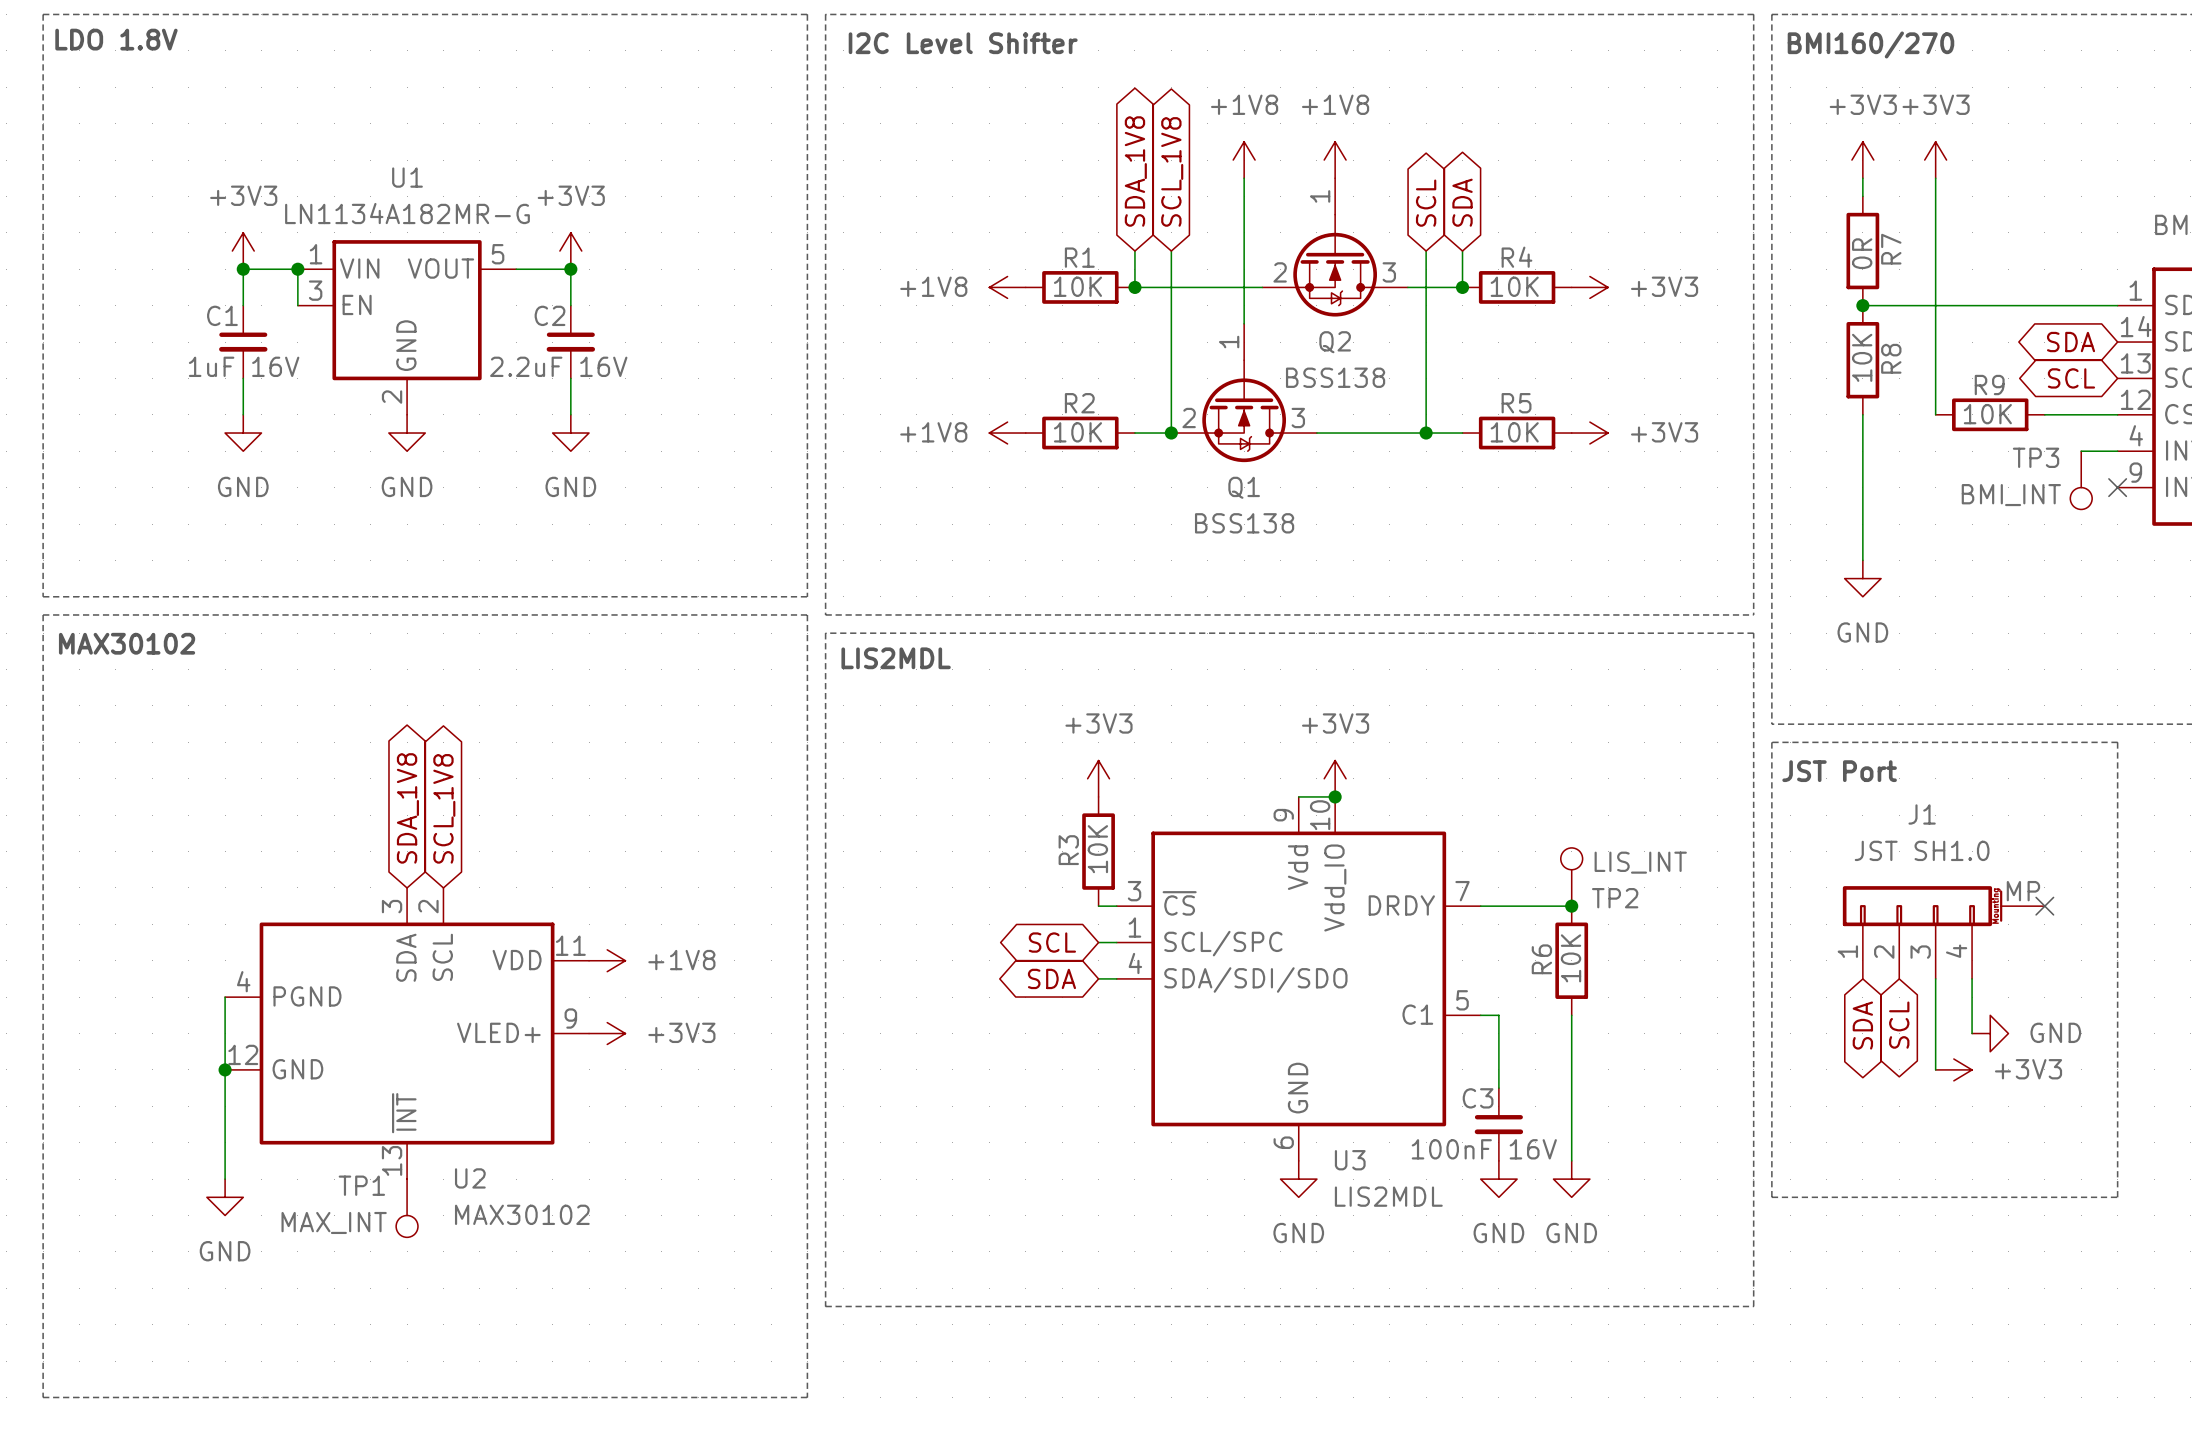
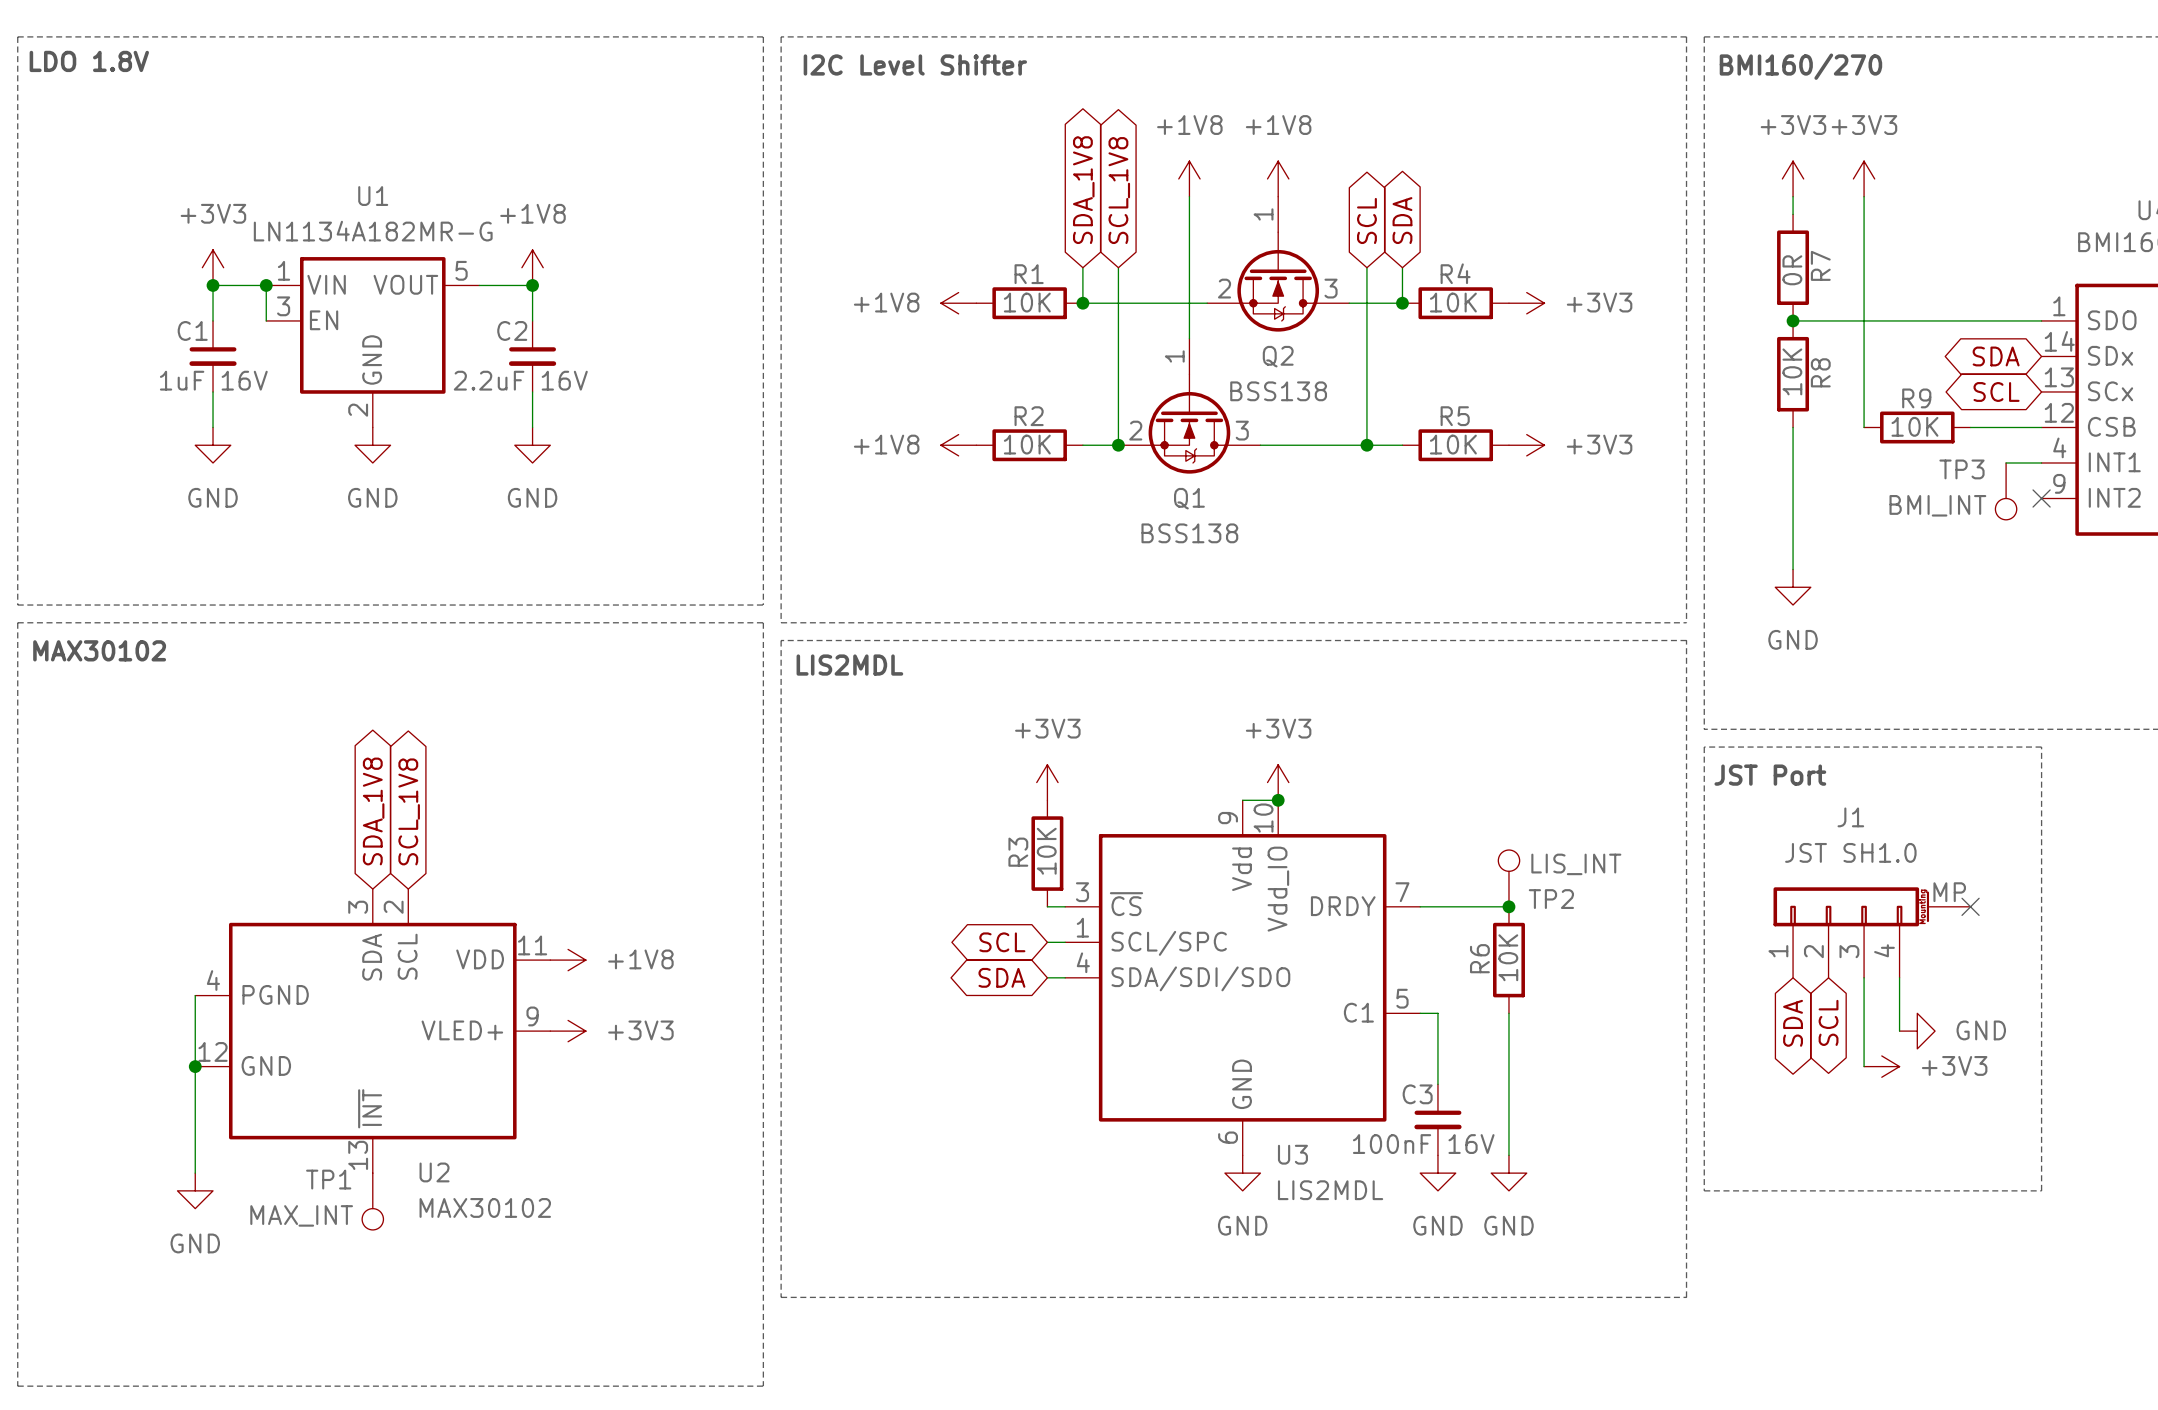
power symbol: +3V3 (570, 251) -> +1V8 (532, 267)

